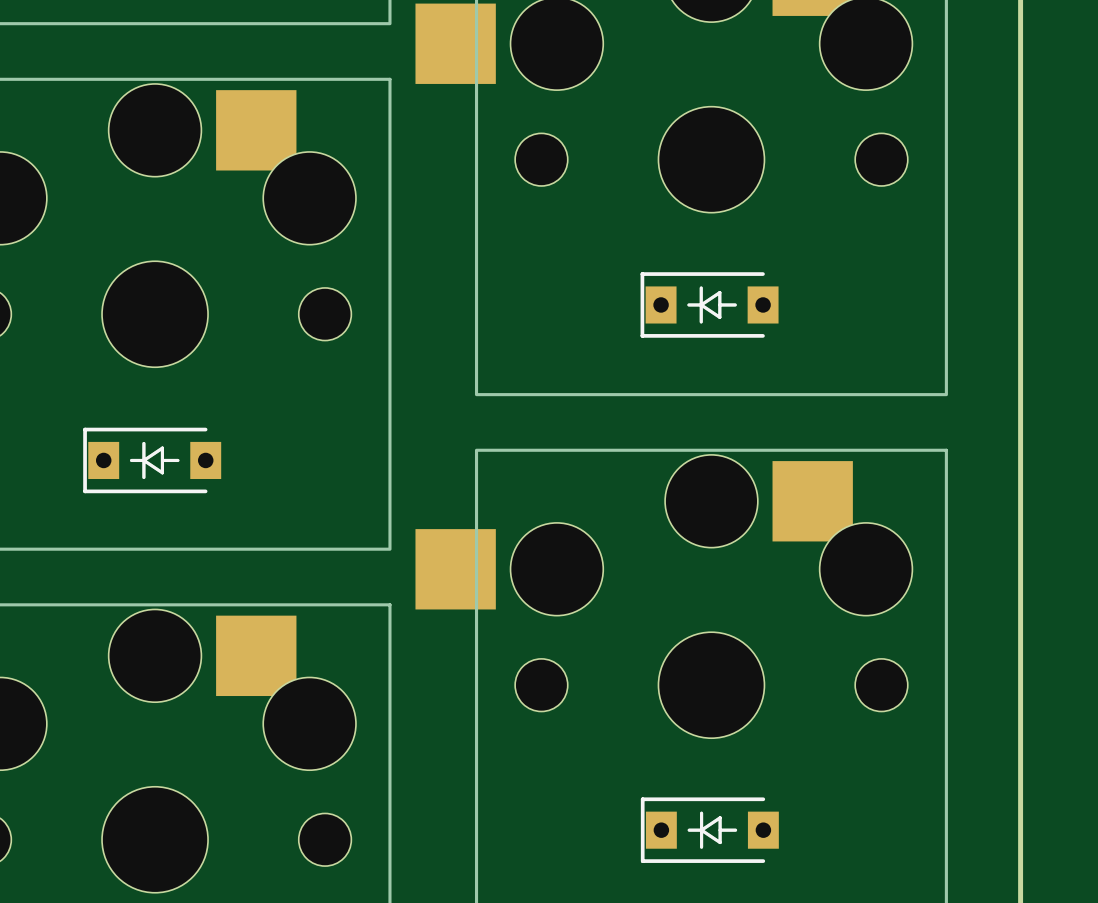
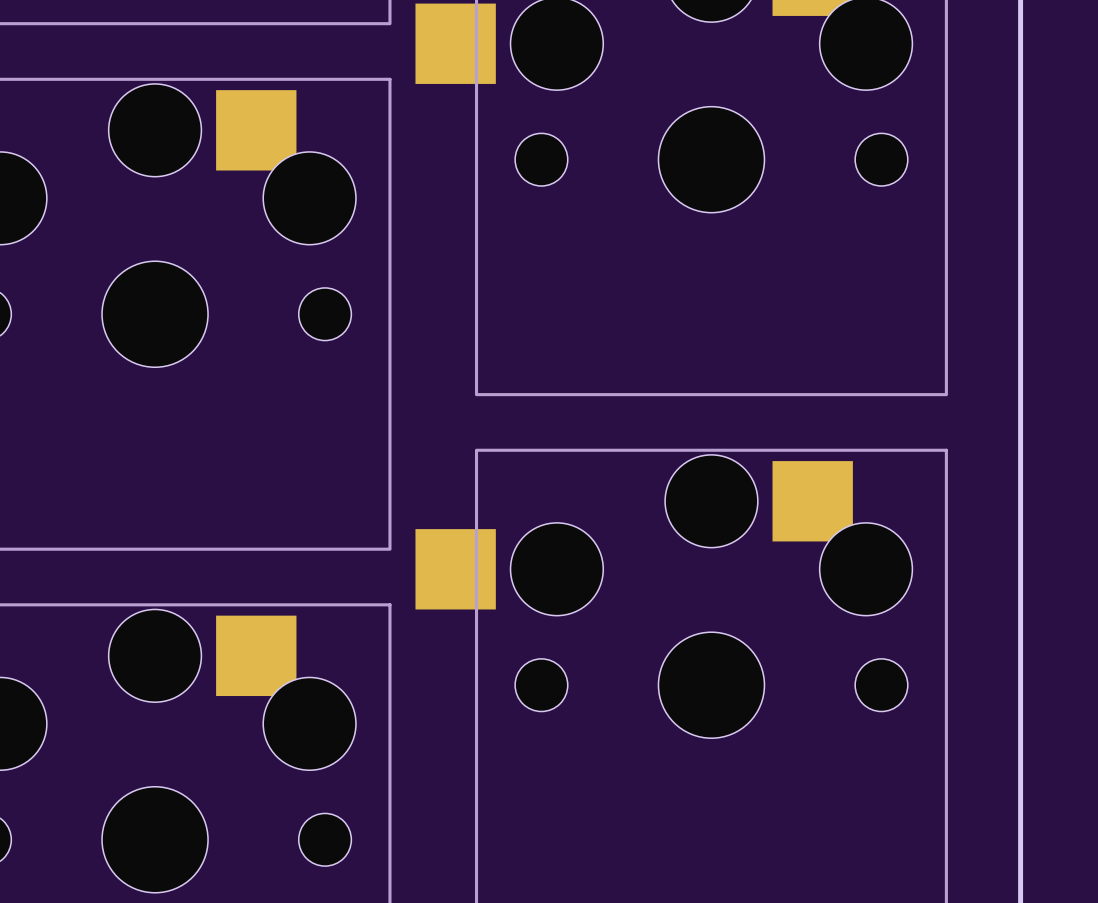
part: (709, 304) -> none
part: (152, 460) -> none
part: (709, 830) -> none

